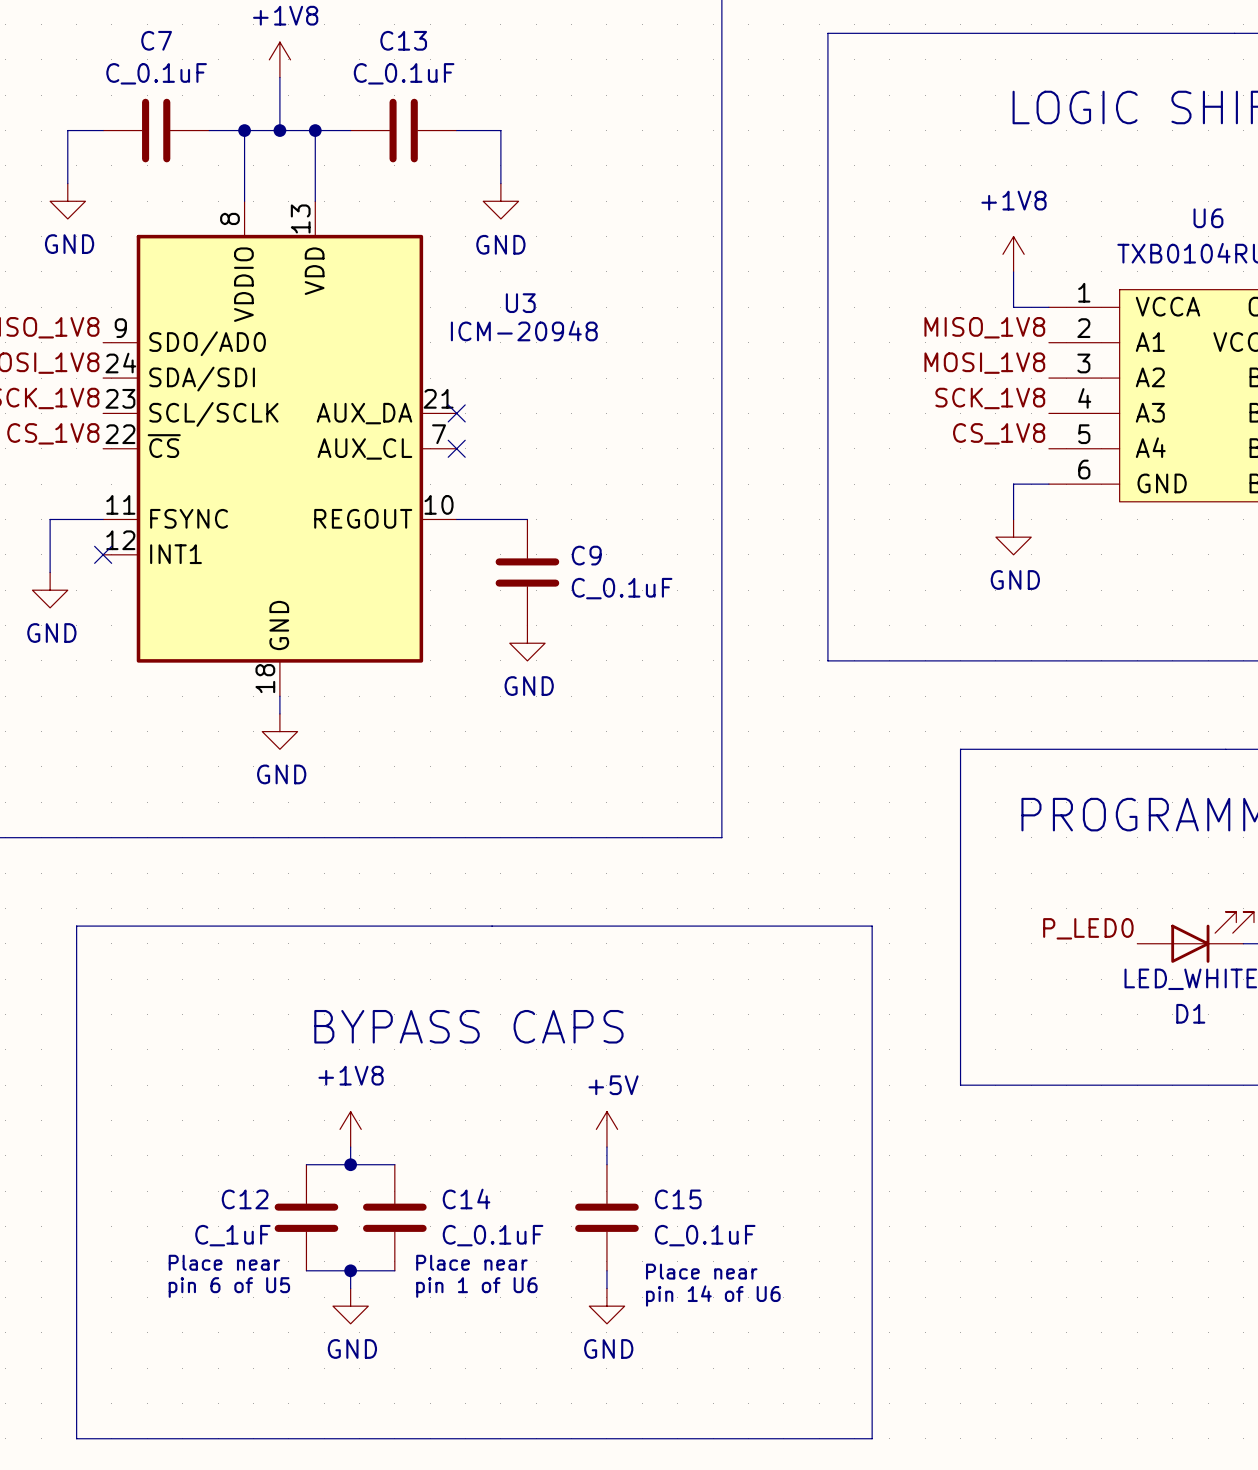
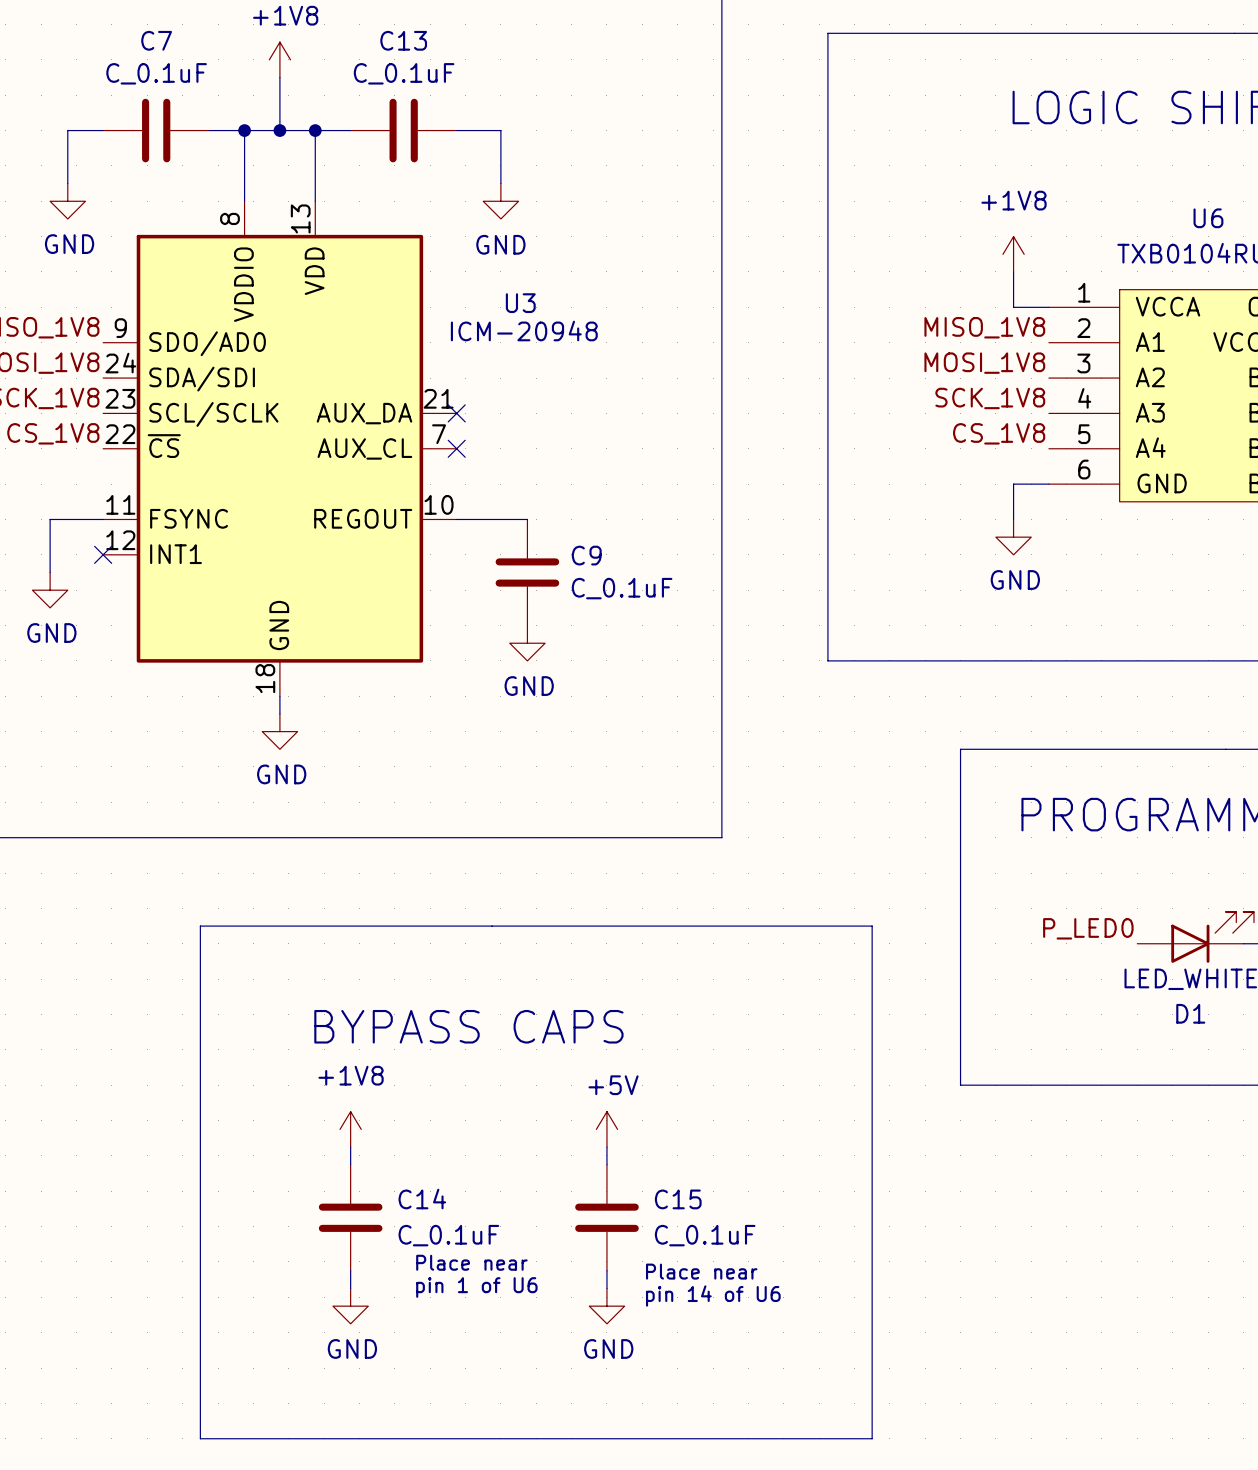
line: (200, 926) (76, 926) (76, 1438) (200, 1438) -> (200, 926) (200, 1438)
wire: (306, 1164) (394, 1164) -> none
junction: (350, 1164) -> none
C12: C_1uF (306, 1217) -> none
C14 position: (394, 1217) -> (350, 1217)
text: Place near (224, 1262) -> none
wire: (306, 1270) (394, 1270) -> none
junction: (350, 1270) -> none
text: pin 6 of U5 (229, 1287) -> none

